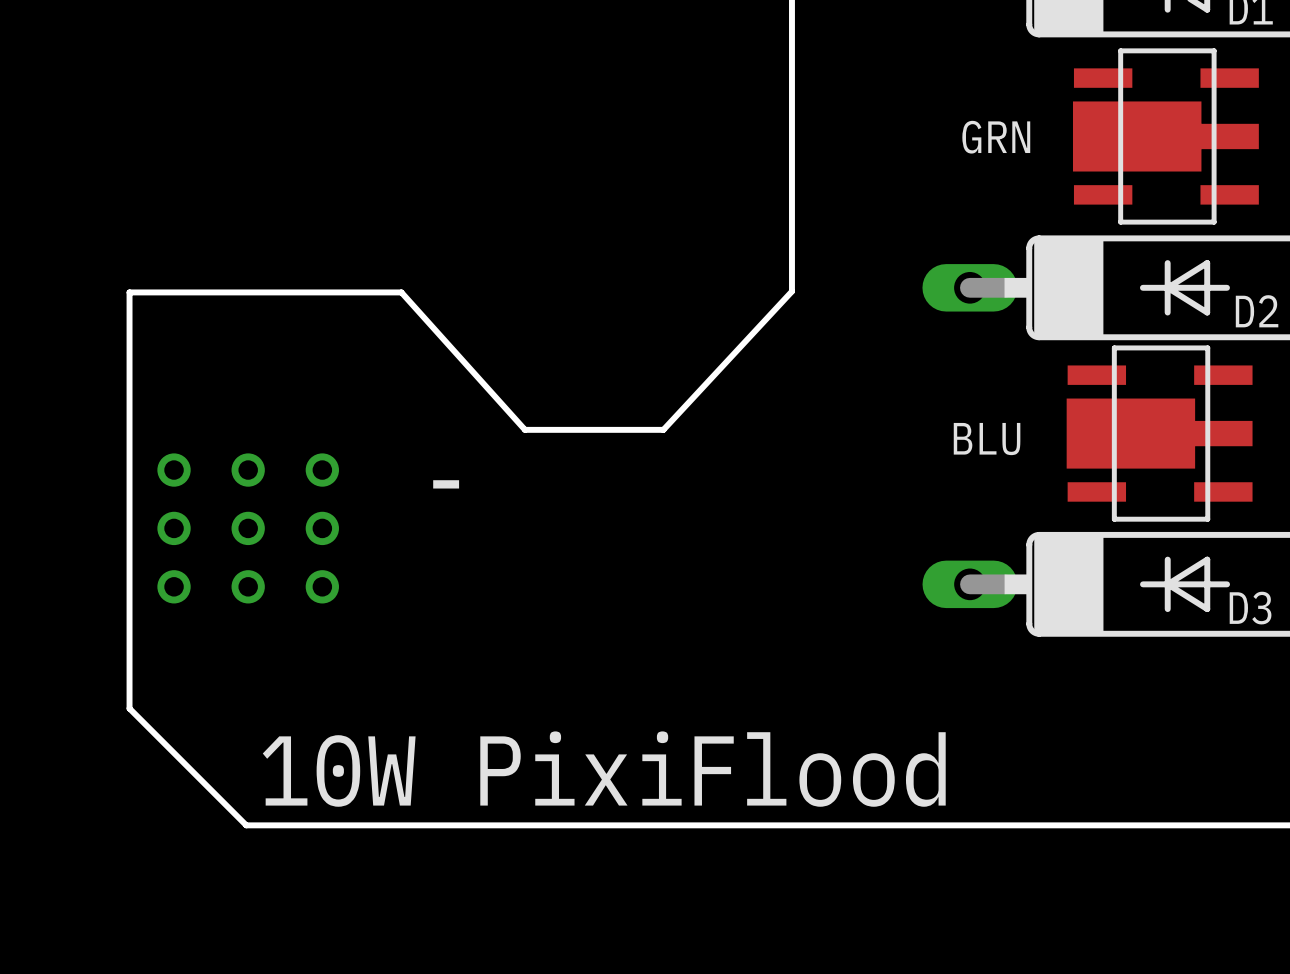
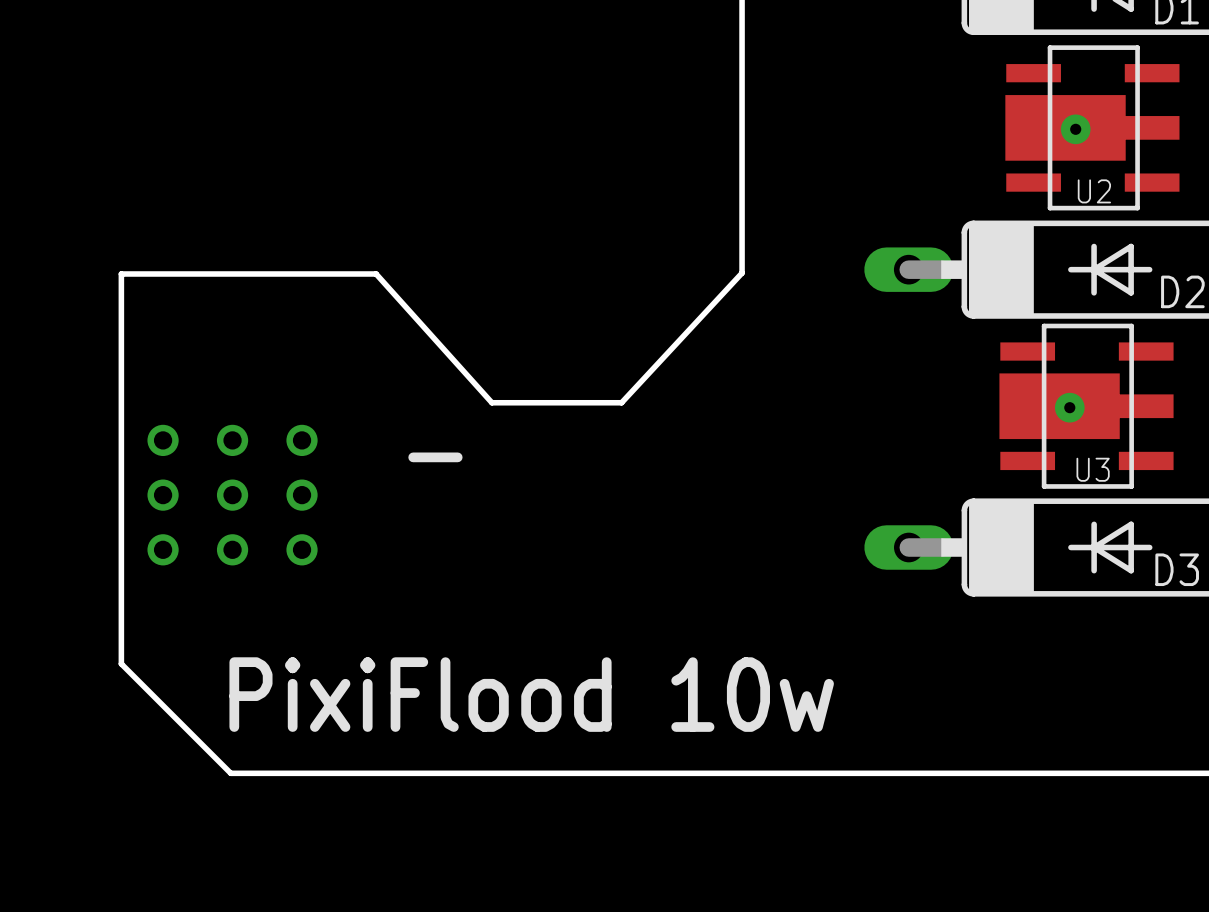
part: (1165, 136) -> none
U2: none -> (1092, 127)
text: GRN (996, 137) -> none
part: (1159, 433) -> none
U3: none -> (1086, 406)
text: BLU (987, 439) -> none
text: 10W PixiFlood (604, 769) -> PixiFlood 10w (531, 694)

